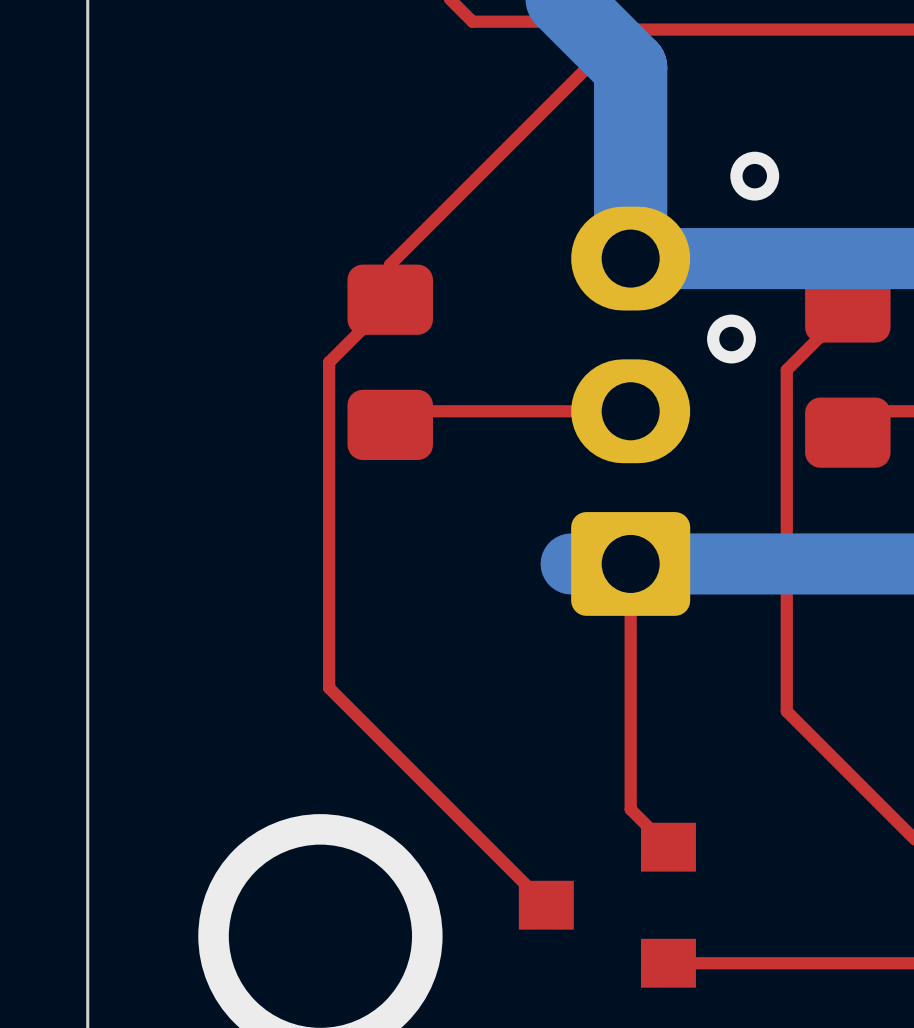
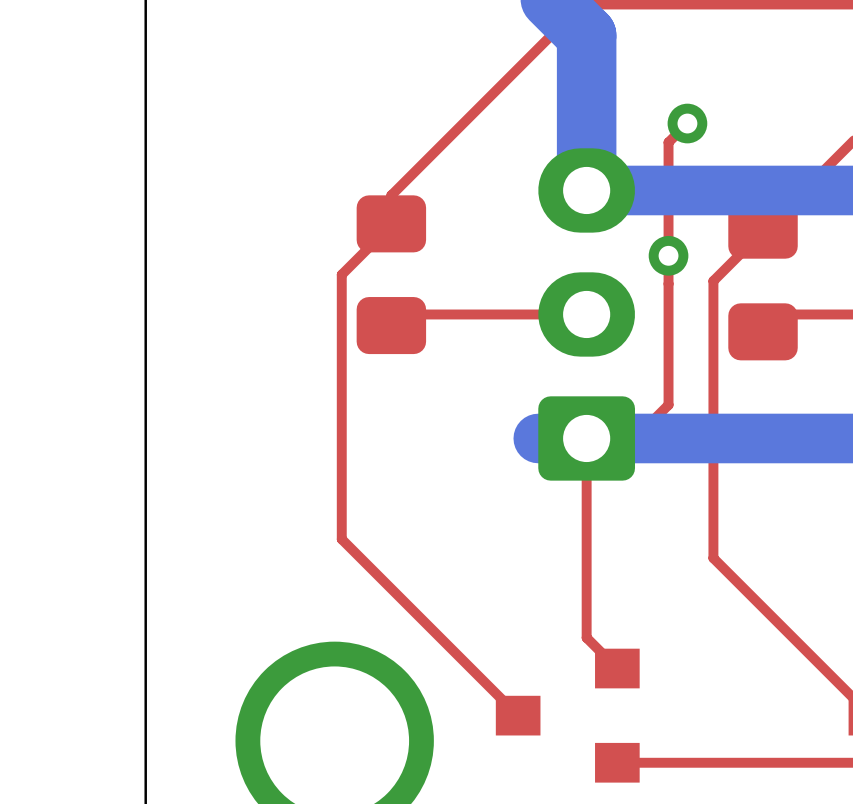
top track: none -> (687, 123) (668, 142) (668, 404) (635, 438) (586, 438)

